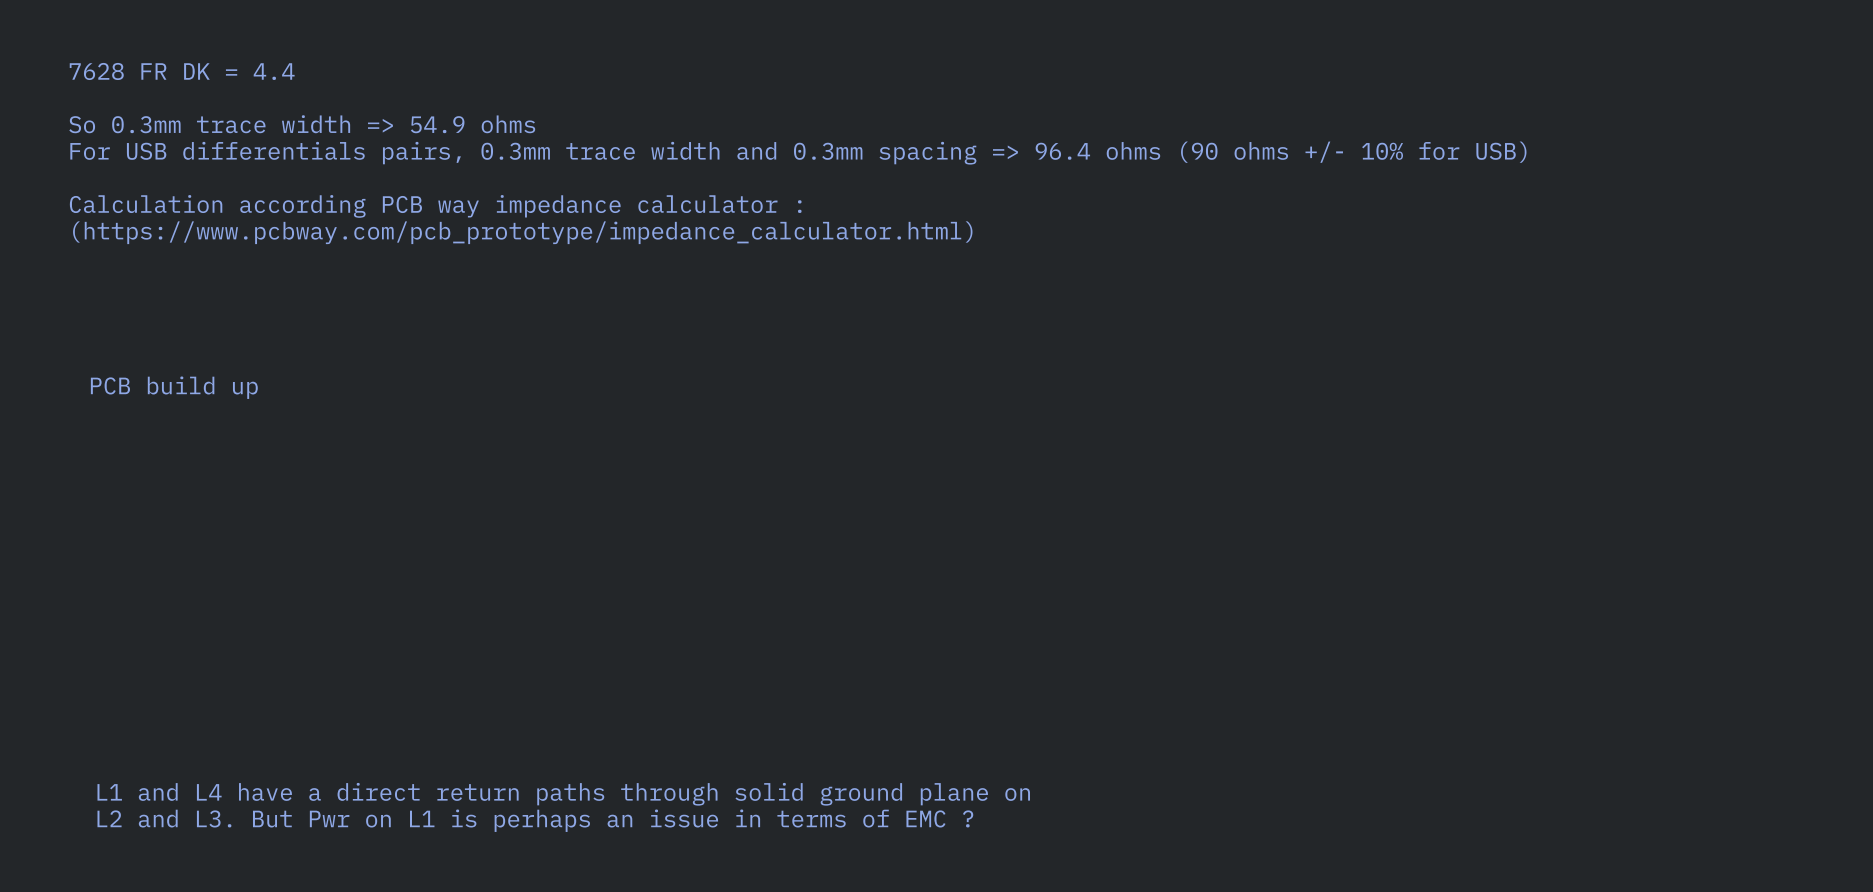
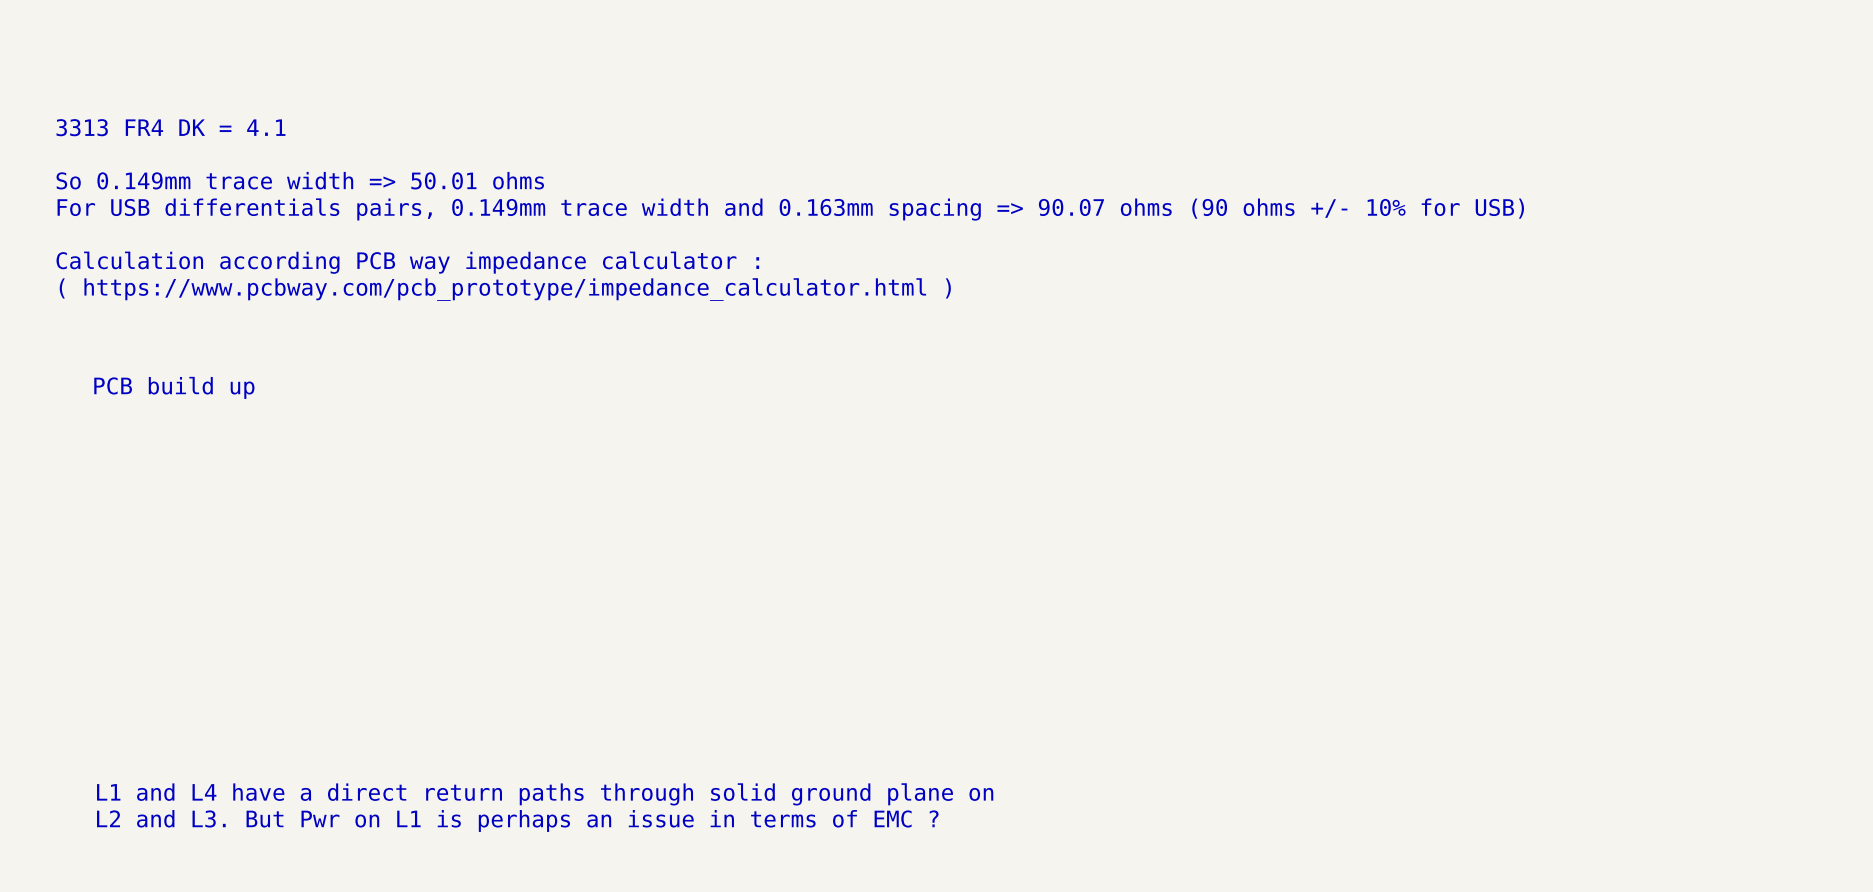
text: 7628 FR DK = 4.4 (182, 71) -> none
text: So 0.3mm trace width => 54.9 ohms (302, 124) -> none
text: none -> 3313 FR4 DK = 4.1 (170, 127)
text: For USB differentials pairs, 0.3mm trace width and 0.3mm spacing => 96.4 ohms (90 ohms +/- 10% for USB) (798, 153) -> none
text: none -> So 0.149mm trace width => 50.01 ohms (300, 180)
text position: Calculation according PCB way impedance calculator : (435, 206) -> Calculation according PCB way impedance calculator : (407, 262)
text: none -> For USB differentials pairs, 0.149mm trace width and 0.163mm spacing => 90.07 ohms (90 ohms +/- 10% for USB) (790, 209)
text: (https://www.pcbway.com/pcb_prototype/impedance_calculator.html) (522, 232) -> none
text: none -> ( https://www.pcbway.com/pcb_prototype/impedance_calculator.html ) (505, 289)

